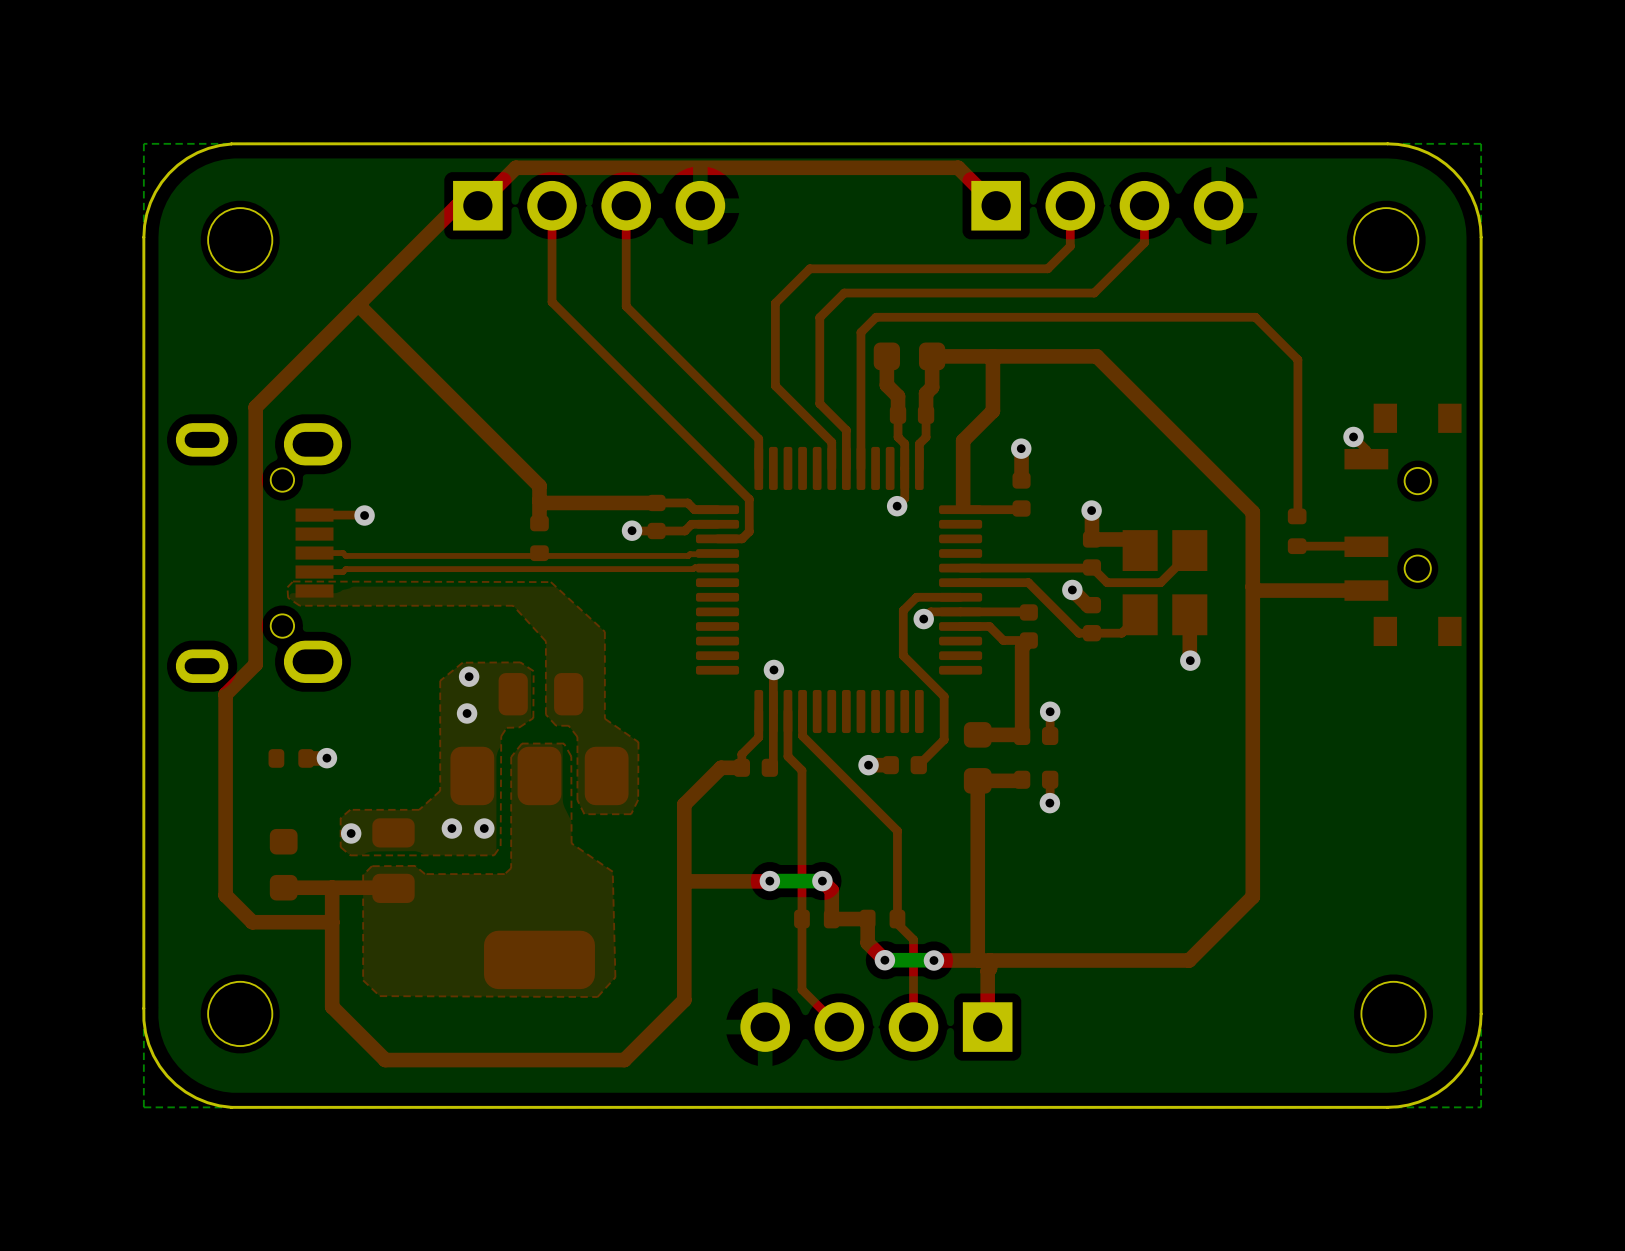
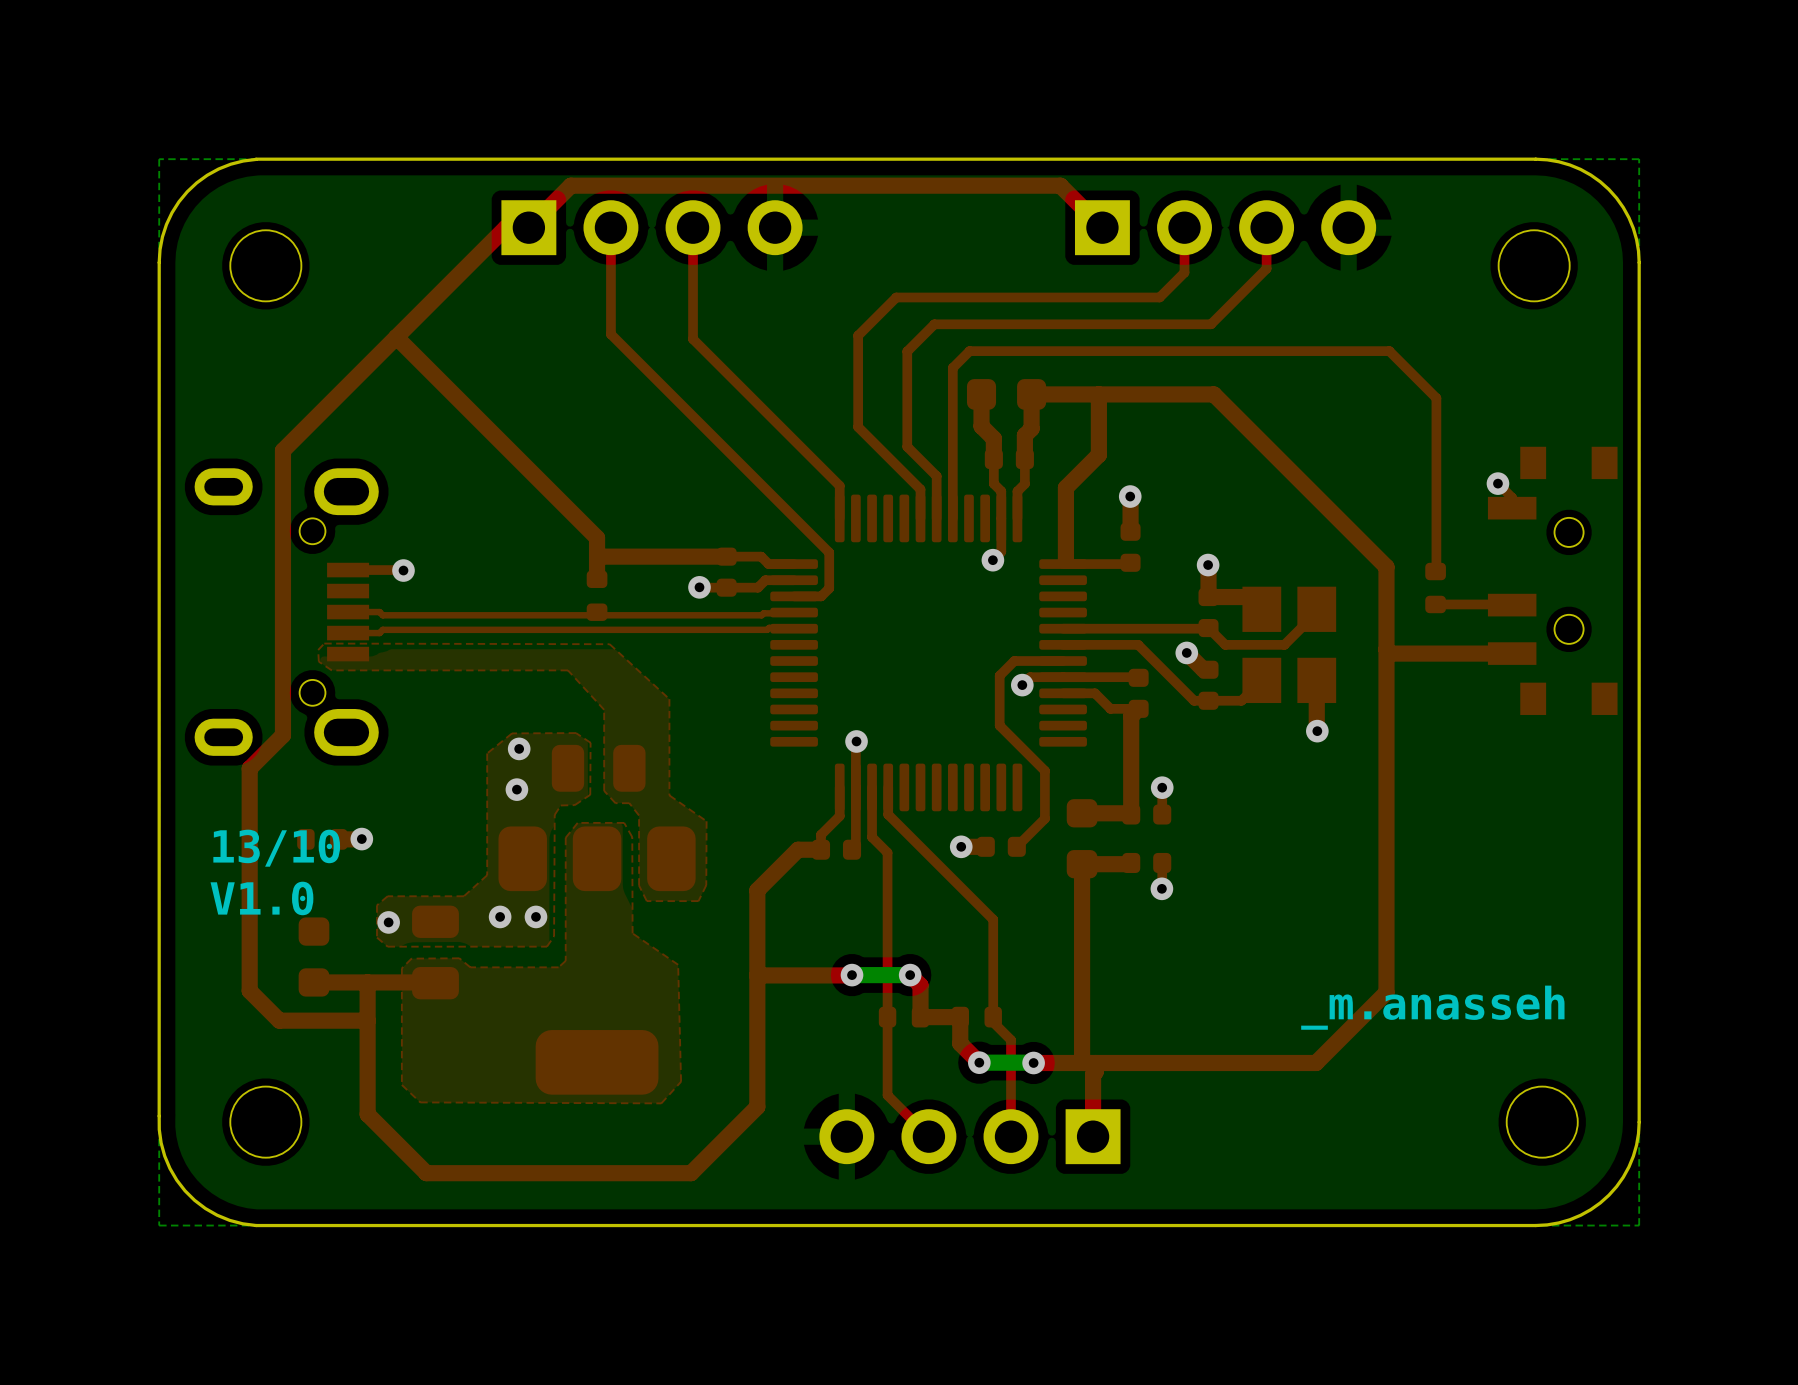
text: none -> 13/10 (276, 848)
text: none -> V1.0 (261, 898)
text: none -> _m.anasseh (1432, 1007)

